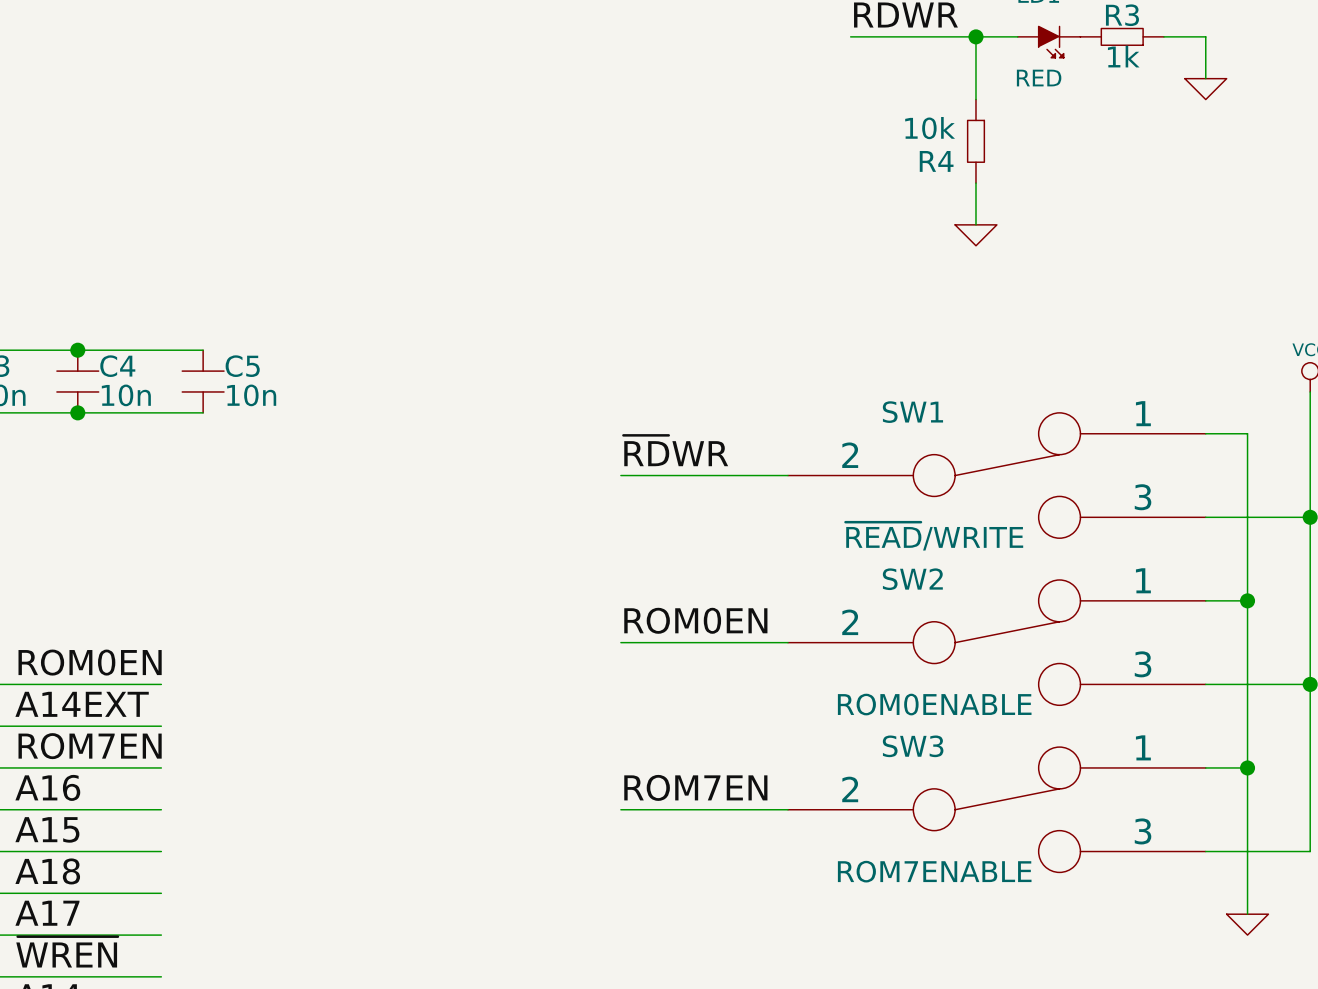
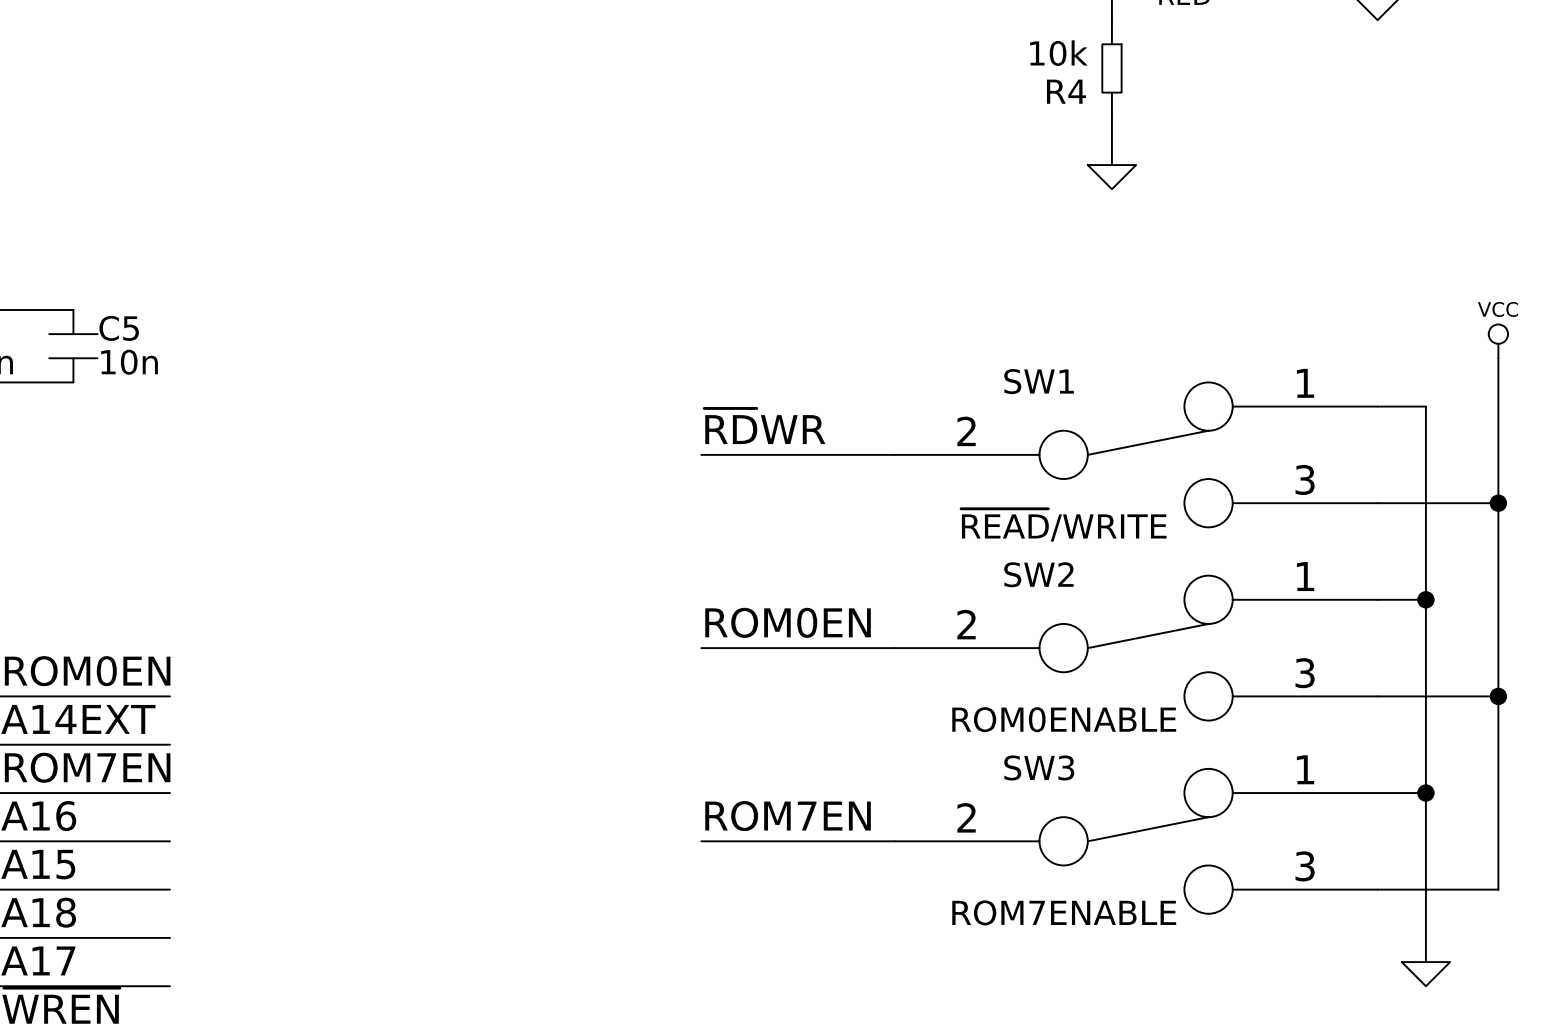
wire: (77, 350) (203, 350) -> none
junction: (77, 350) -> none
C4 name: C4 (117, 366) -> C5 (119, 328)
C5: 10n (203, 381) -> none
wire: (77, 412) (203, 412) -> none
junction: (77, 412) -> none

